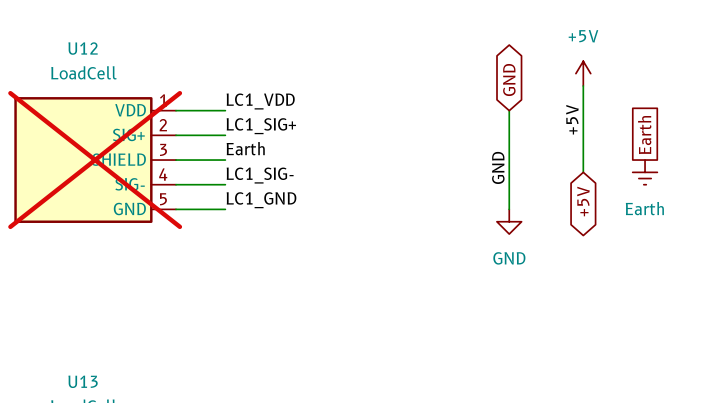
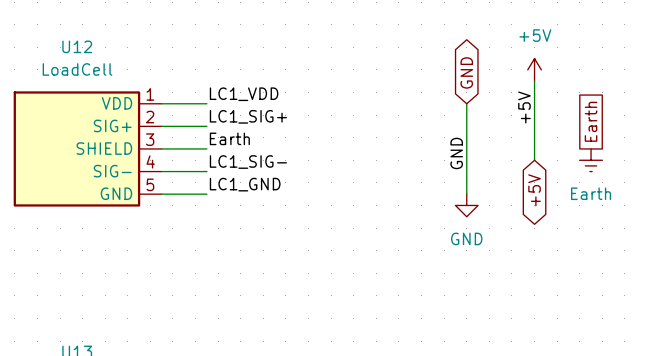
U12 do-not-place cross: (95, 160) -> none

